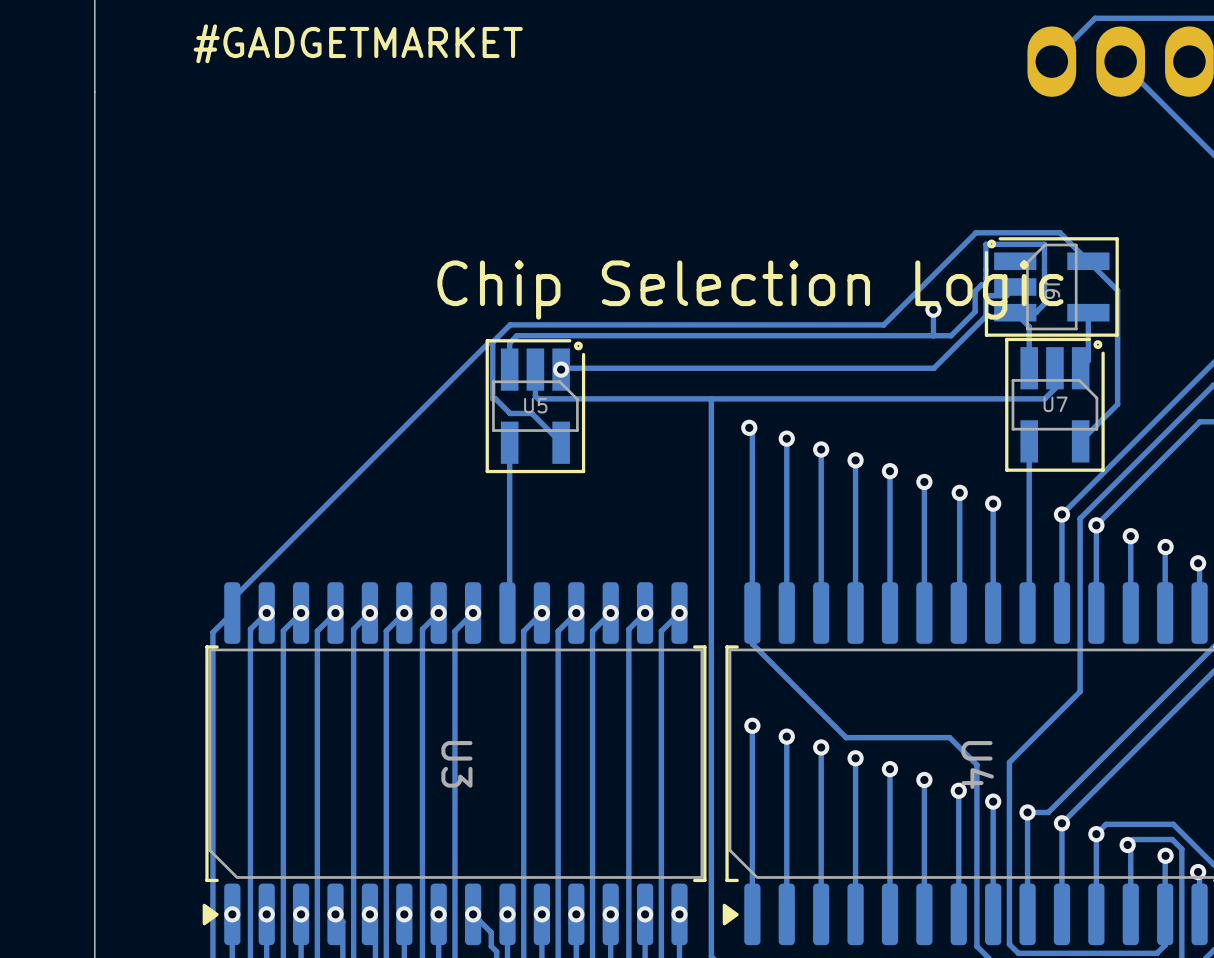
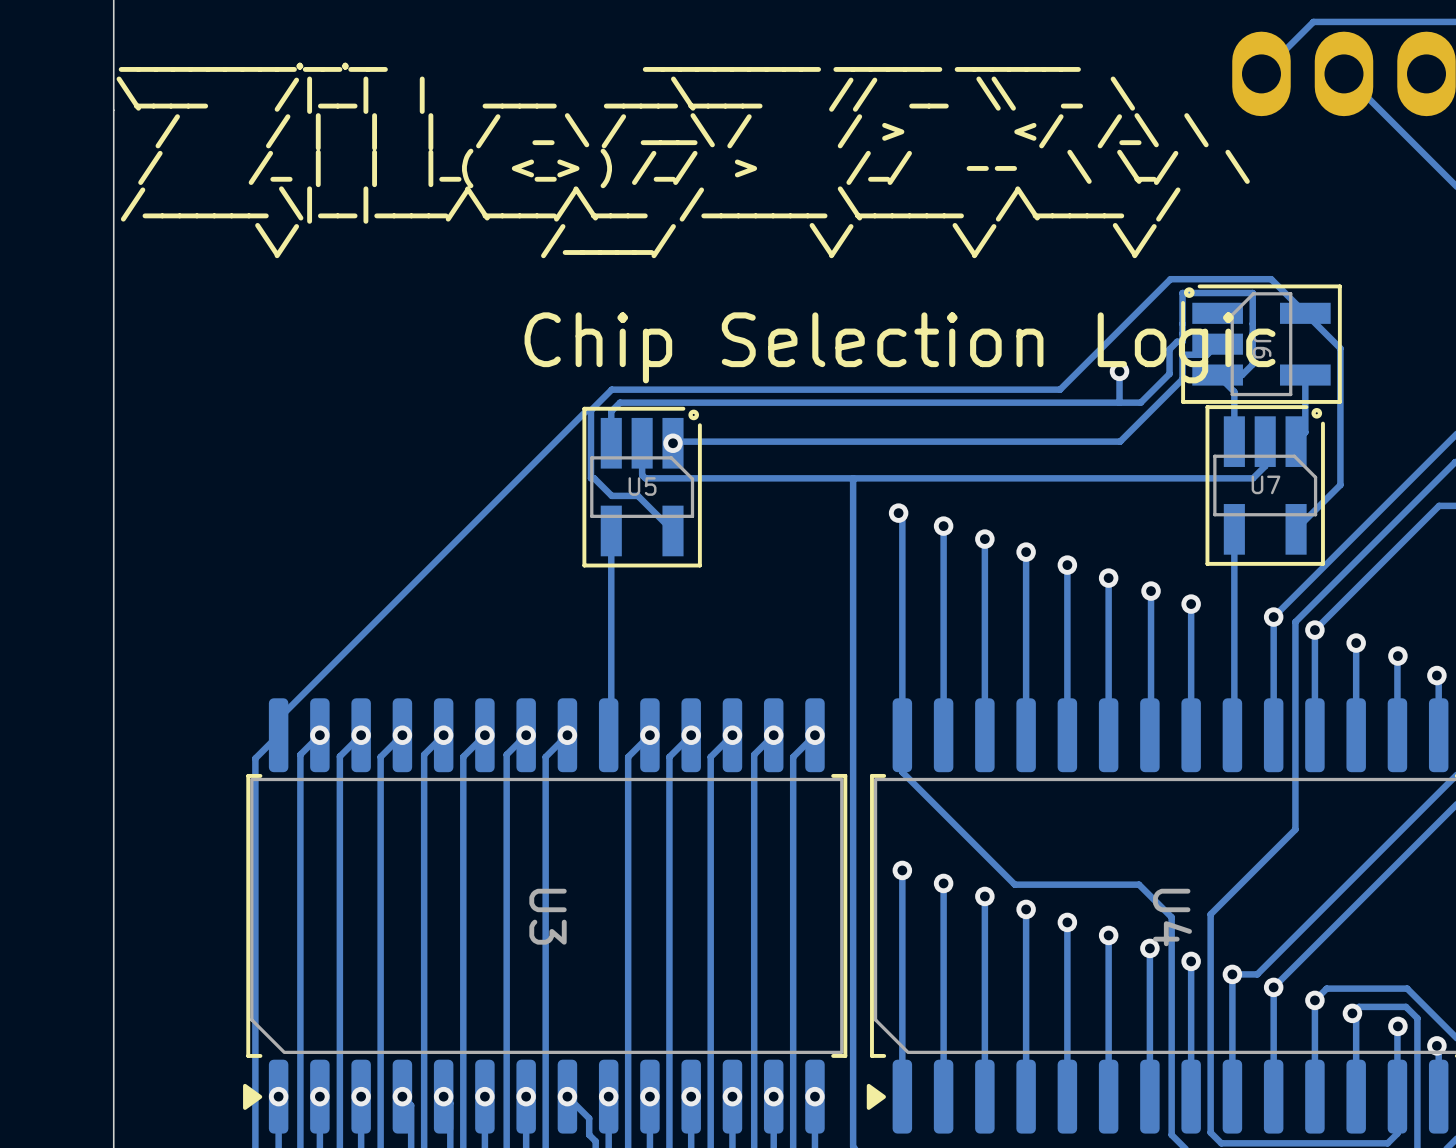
text: #GADGETMARKET (358, 43) -> none
text: none -> __________.__.__ __________ ______ _______ (599, 67)
text: none -> \____ /|__| | ____ ____\____ // __ \\ _ \ (625, 95)
text: none -> / / | | | / _ \ / ___\ / / > </ /_\ \ (682, 131)
text: none -> / /_ | | |_( <_> ) /_/ > /_/ -- \ \_/ \ (694, 168)
text: none -> /_______ \|__|____/\____/\___ /_______ \______ /\_____ / (650, 205)
text: none -> \/ /_____/ \/ \/ \/ (705, 240)

